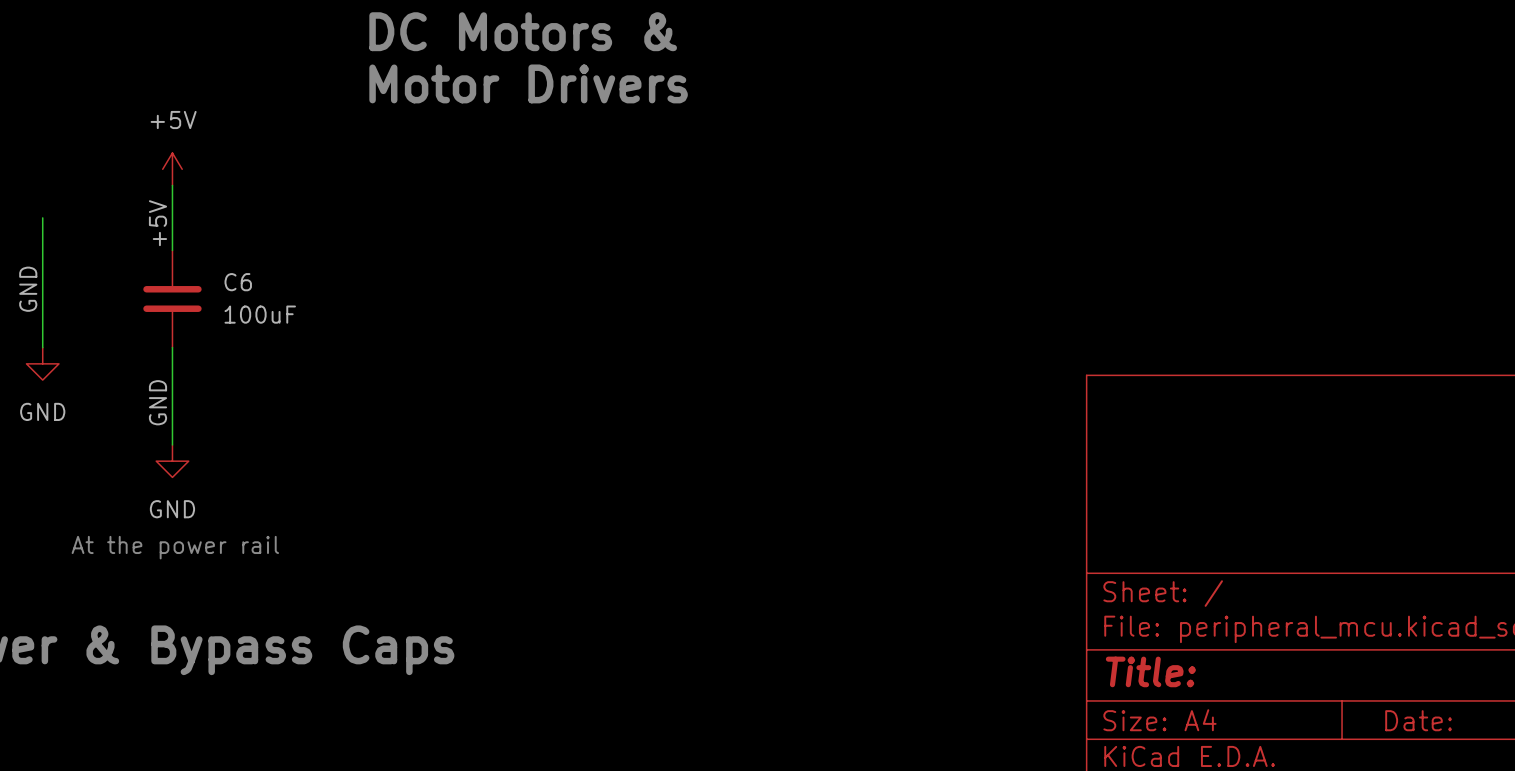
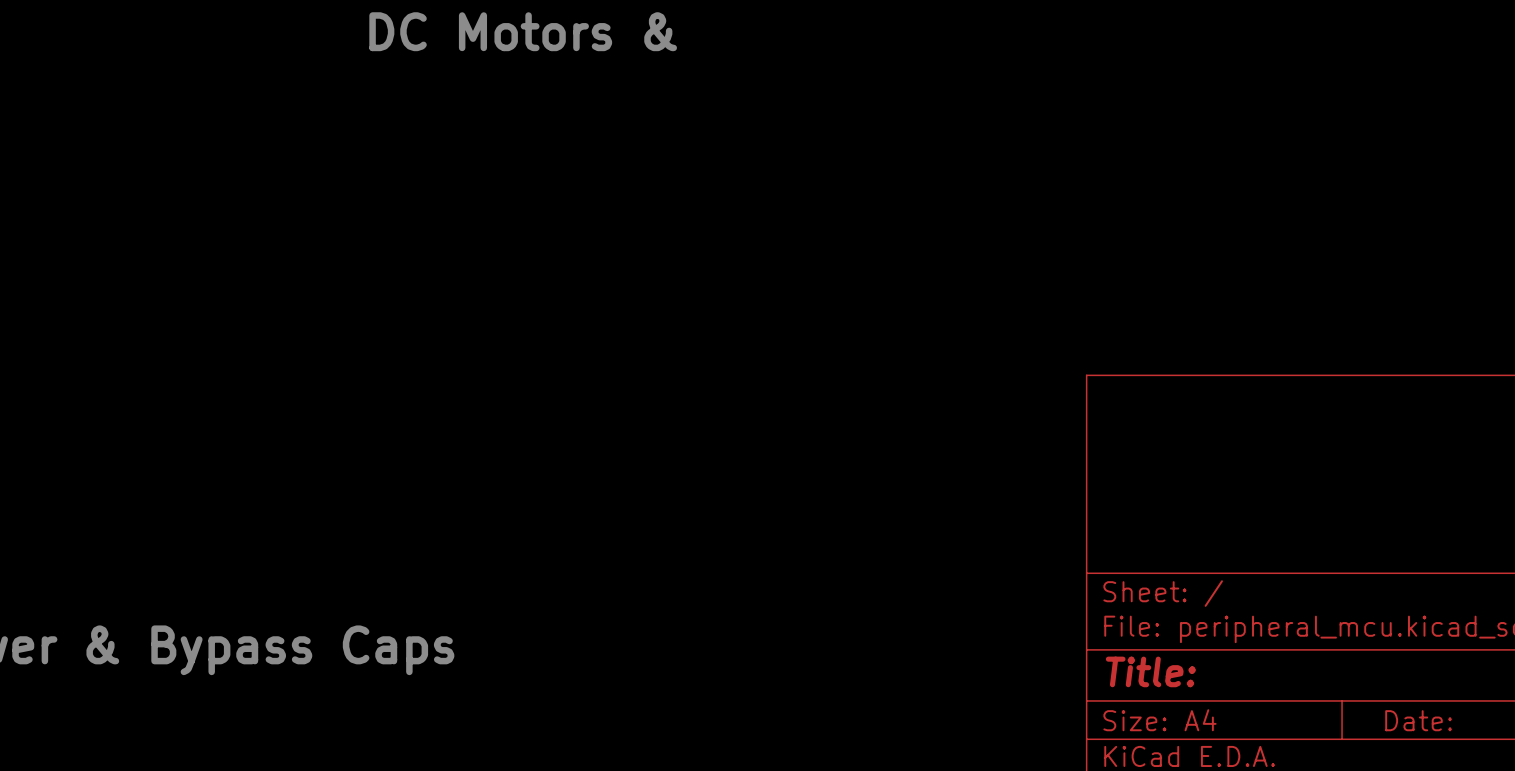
text: Motor Drivers (528, 83) -> none
power symbol: +5V (172, 169) -> none
wire: (172, 185) (172, 250) -> none
wire: (42, 217) (42, 347) -> none
label: +5V (157, 223) -> none
label: GND (28, 289) -> none
C6: 100uF (172, 298) -> none
wire: (172, 347) (172, 444) -> none
power symbol: GND (42, 363) -> none
label: GND (157, 402) -> none
power symbol: GND (172, 461) -> none
text: At the power rail (175, 547) -> none

